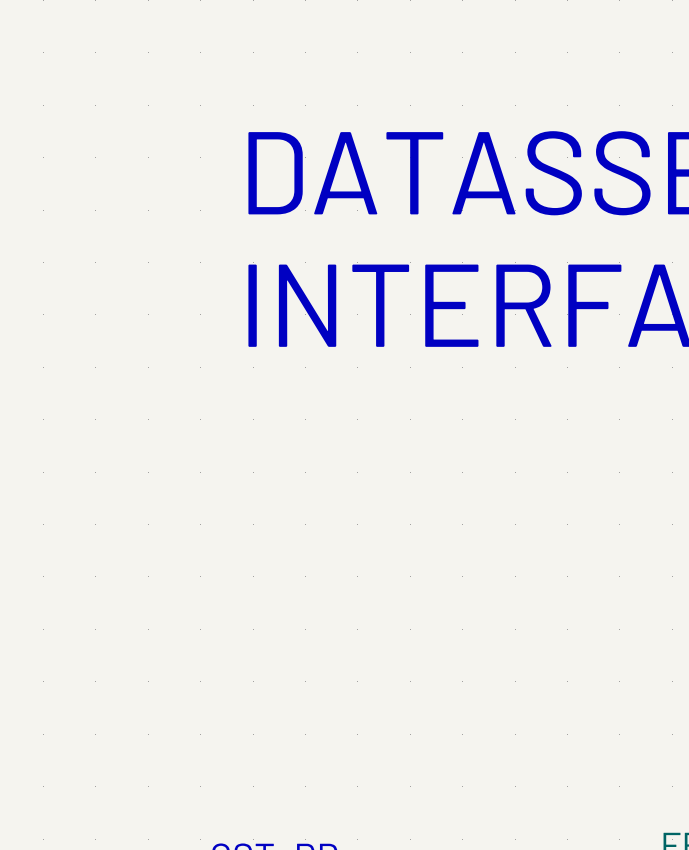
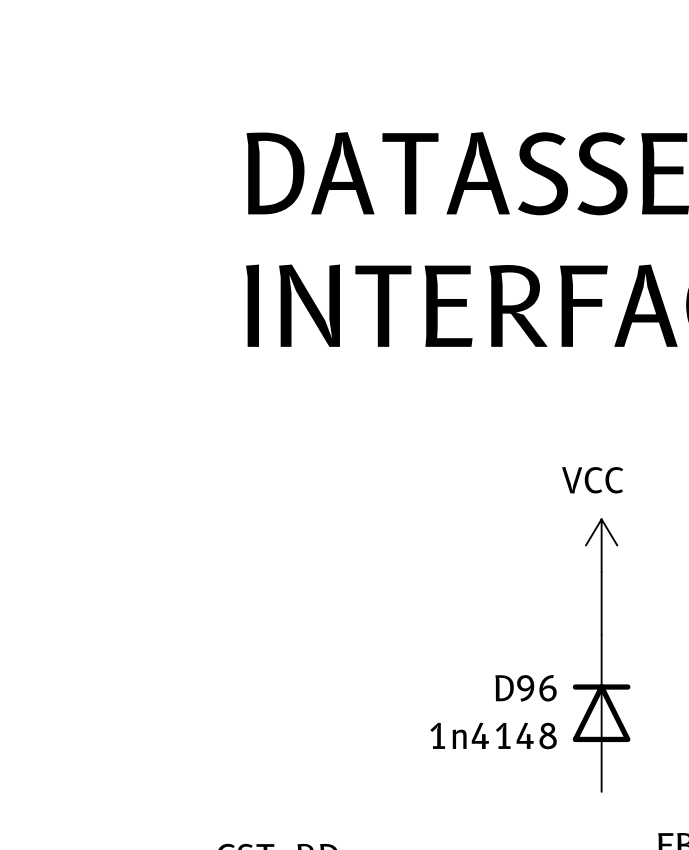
power symbol: none -> VCC (601, 545)
wire: none -> (601, 571) (601, 634)
D96: none -> 1n4148 (601, 713)

